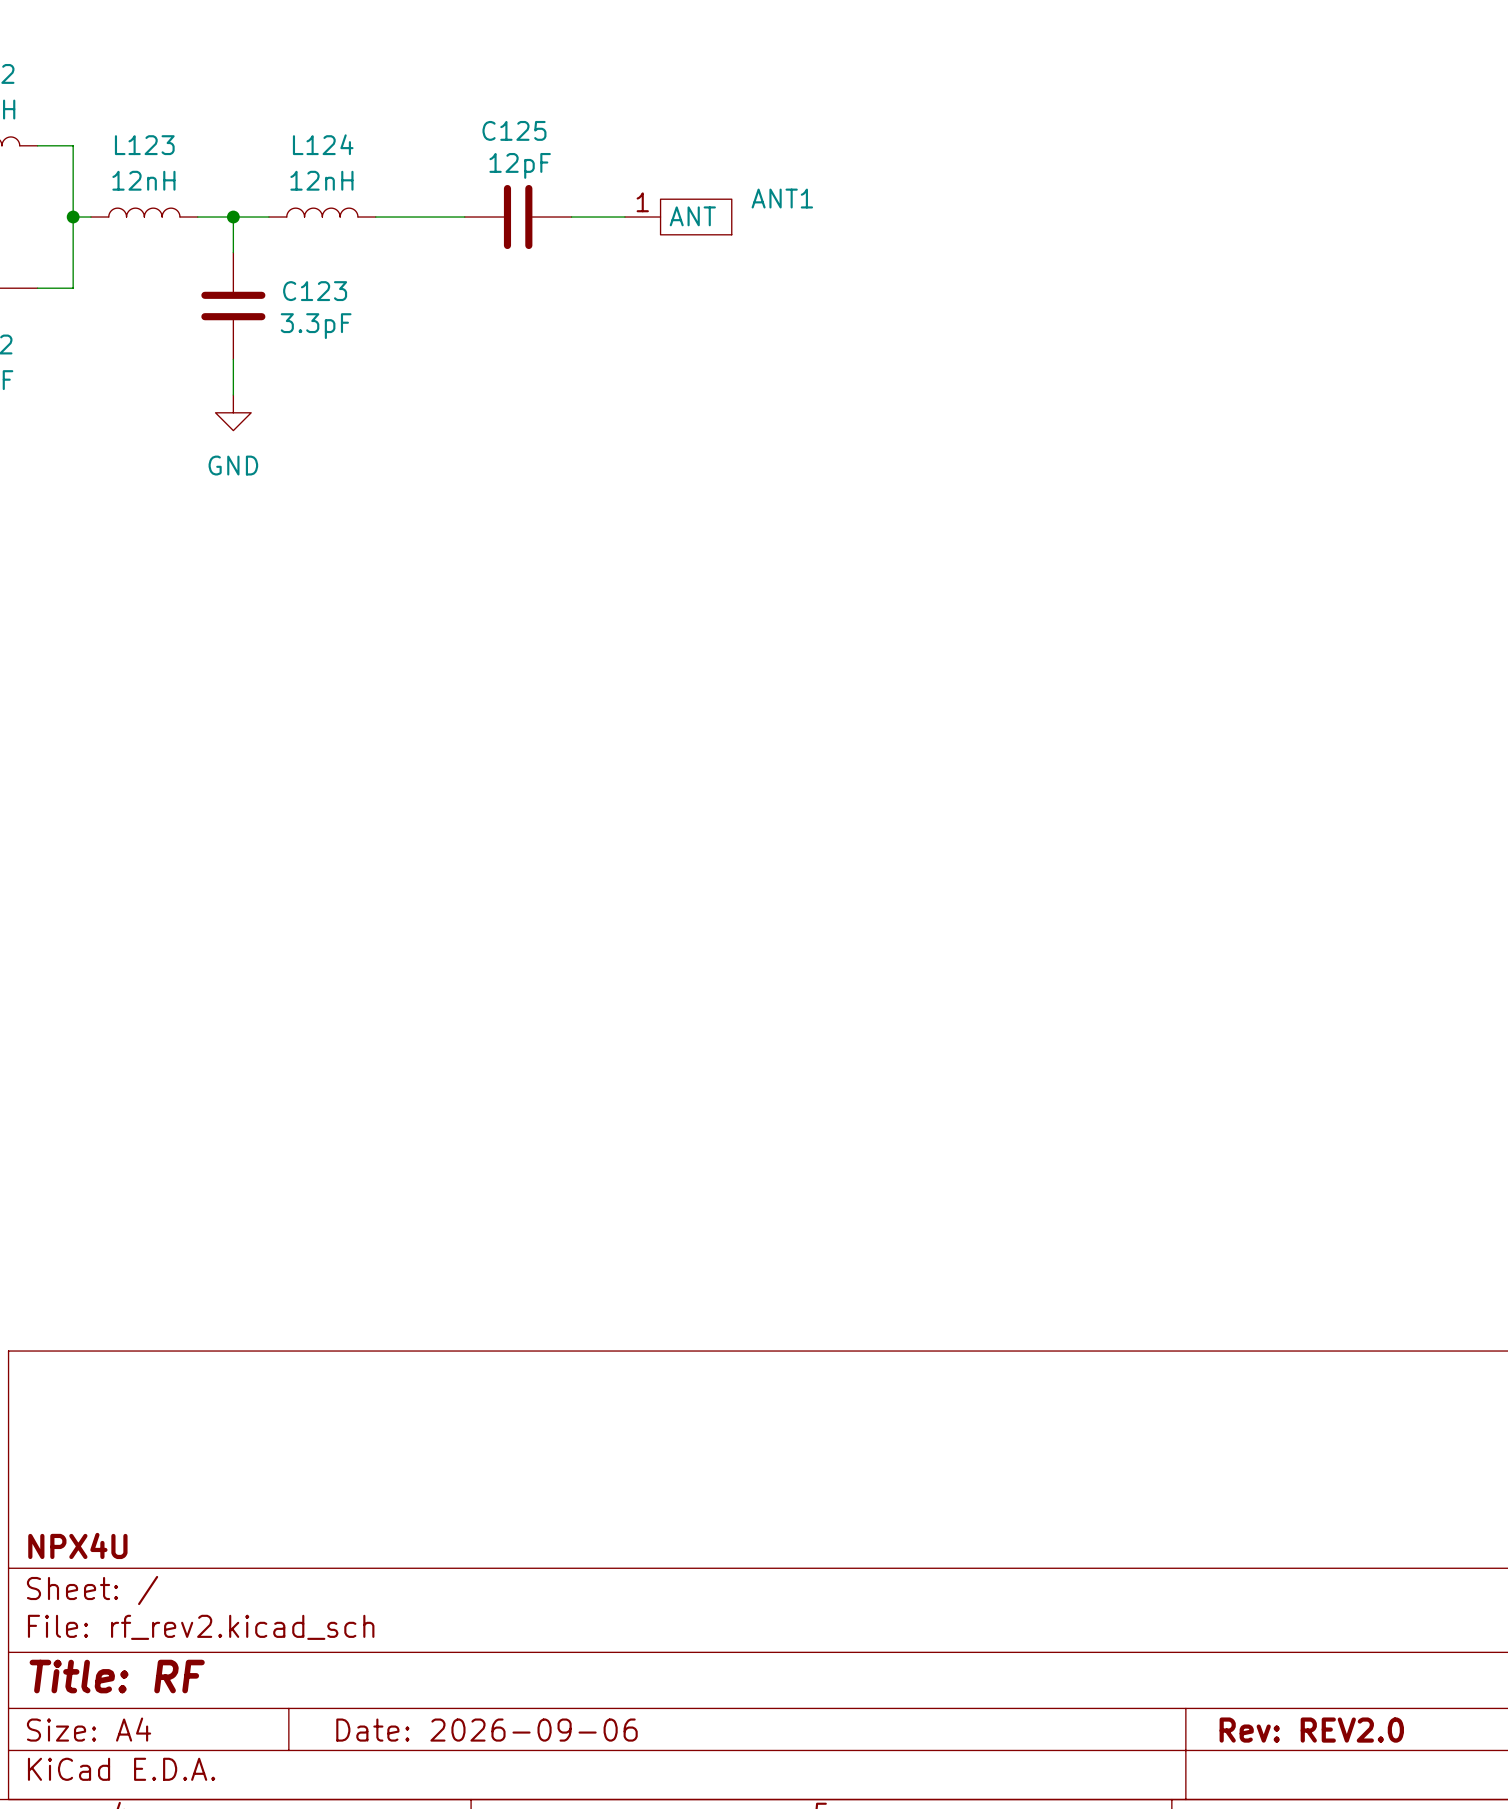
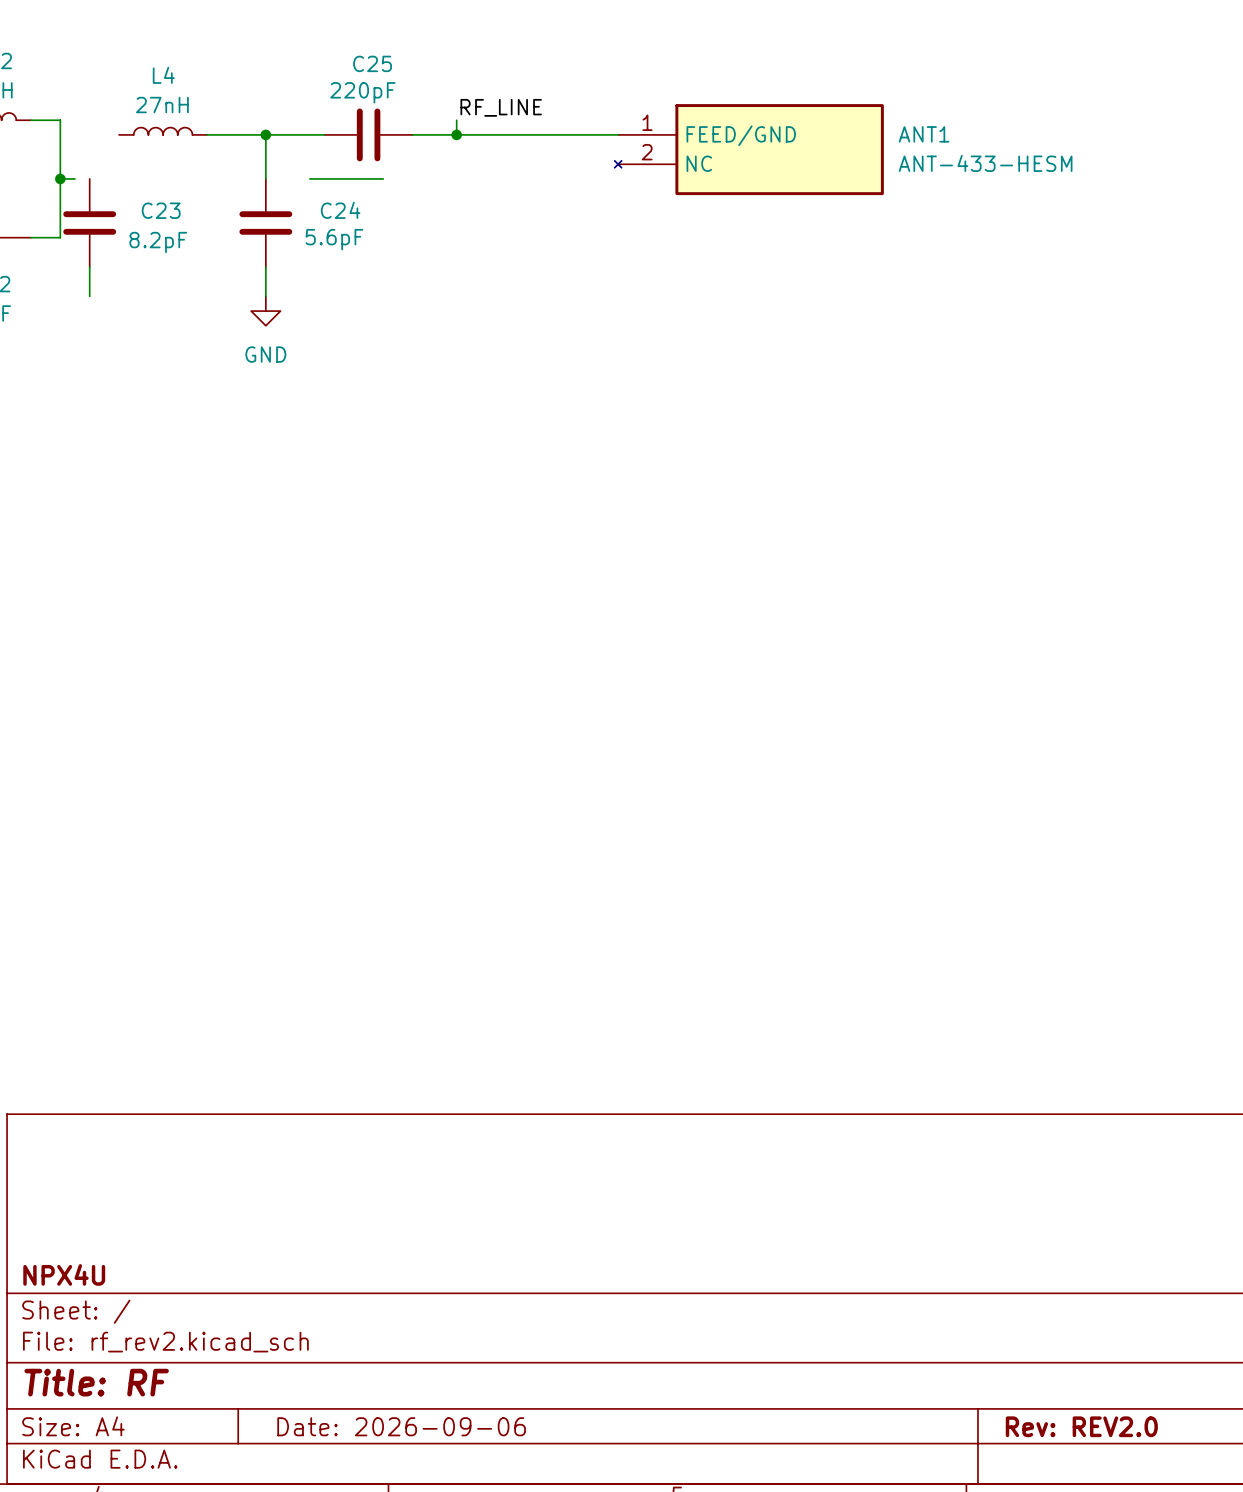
label: none -> RF_LINE (501, 107)
wire: none -> (456, 120) (456, 134)
L4: none -> 27nH (163, 131)
wire: none -> (207, 134) (324, 134)
wire: none -> (265, 134) (265, 178)
junction: none -> (265, 134)
C25: none -> 220pF (368, 134)
wire: none -> (412, 134) (618, 134)
junction: none -> (456, 134)
ANT1 name position: ANT1 (782, 198) -> ANT1 (924, 134)
ANT1 value: none -> ANT-433-HESM (985, 163)
ANT1 symbol: [624, 199, 732, 235] -> [614, 104, 884, 196]
L123: 12nH (144, 212) -> none
L124: 12nH (322, 212) -> none
wire: (197, 217) (268, 217) -> none
wire: (233, 217) (233, 252) -> (89, 267) (89, 296)
junction: (233, 217) -> none
C125: 12pF (518, 217) -> none
wire: (571, 217) (624, 217) -> none
C23: none -> 8.2pF (89, 223)
C24: none -> 5.6pF (265, 223)
C123: 3.3pF (233, 306) -> none
wire: (233, 359) (233, 395) -> (265, 267) (265, 296)
power symbol position: GND (233, 412) -> GND (265, 311)

